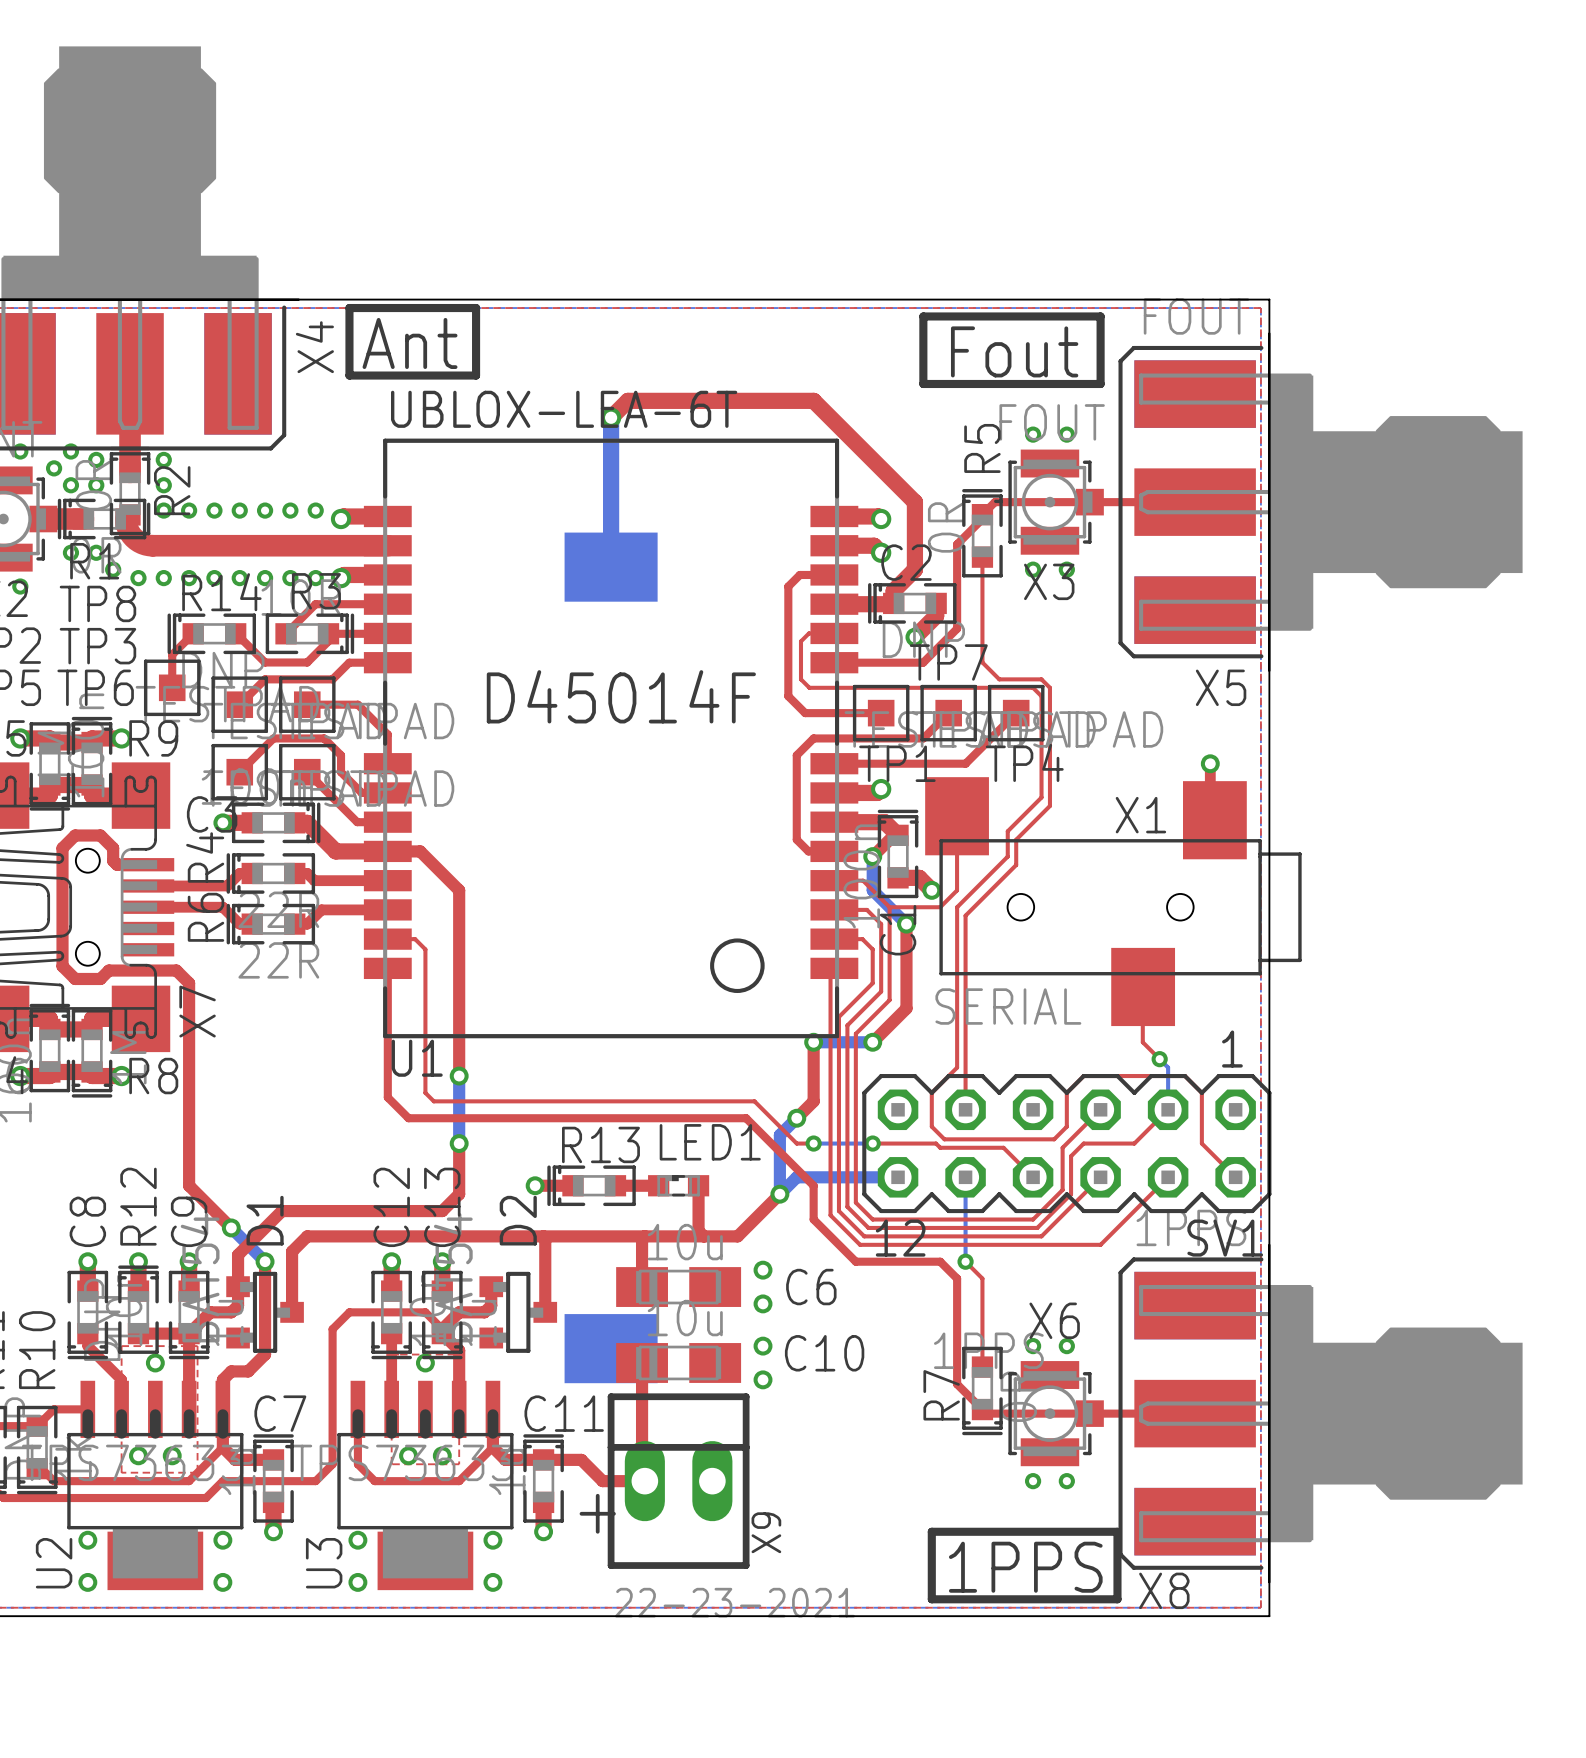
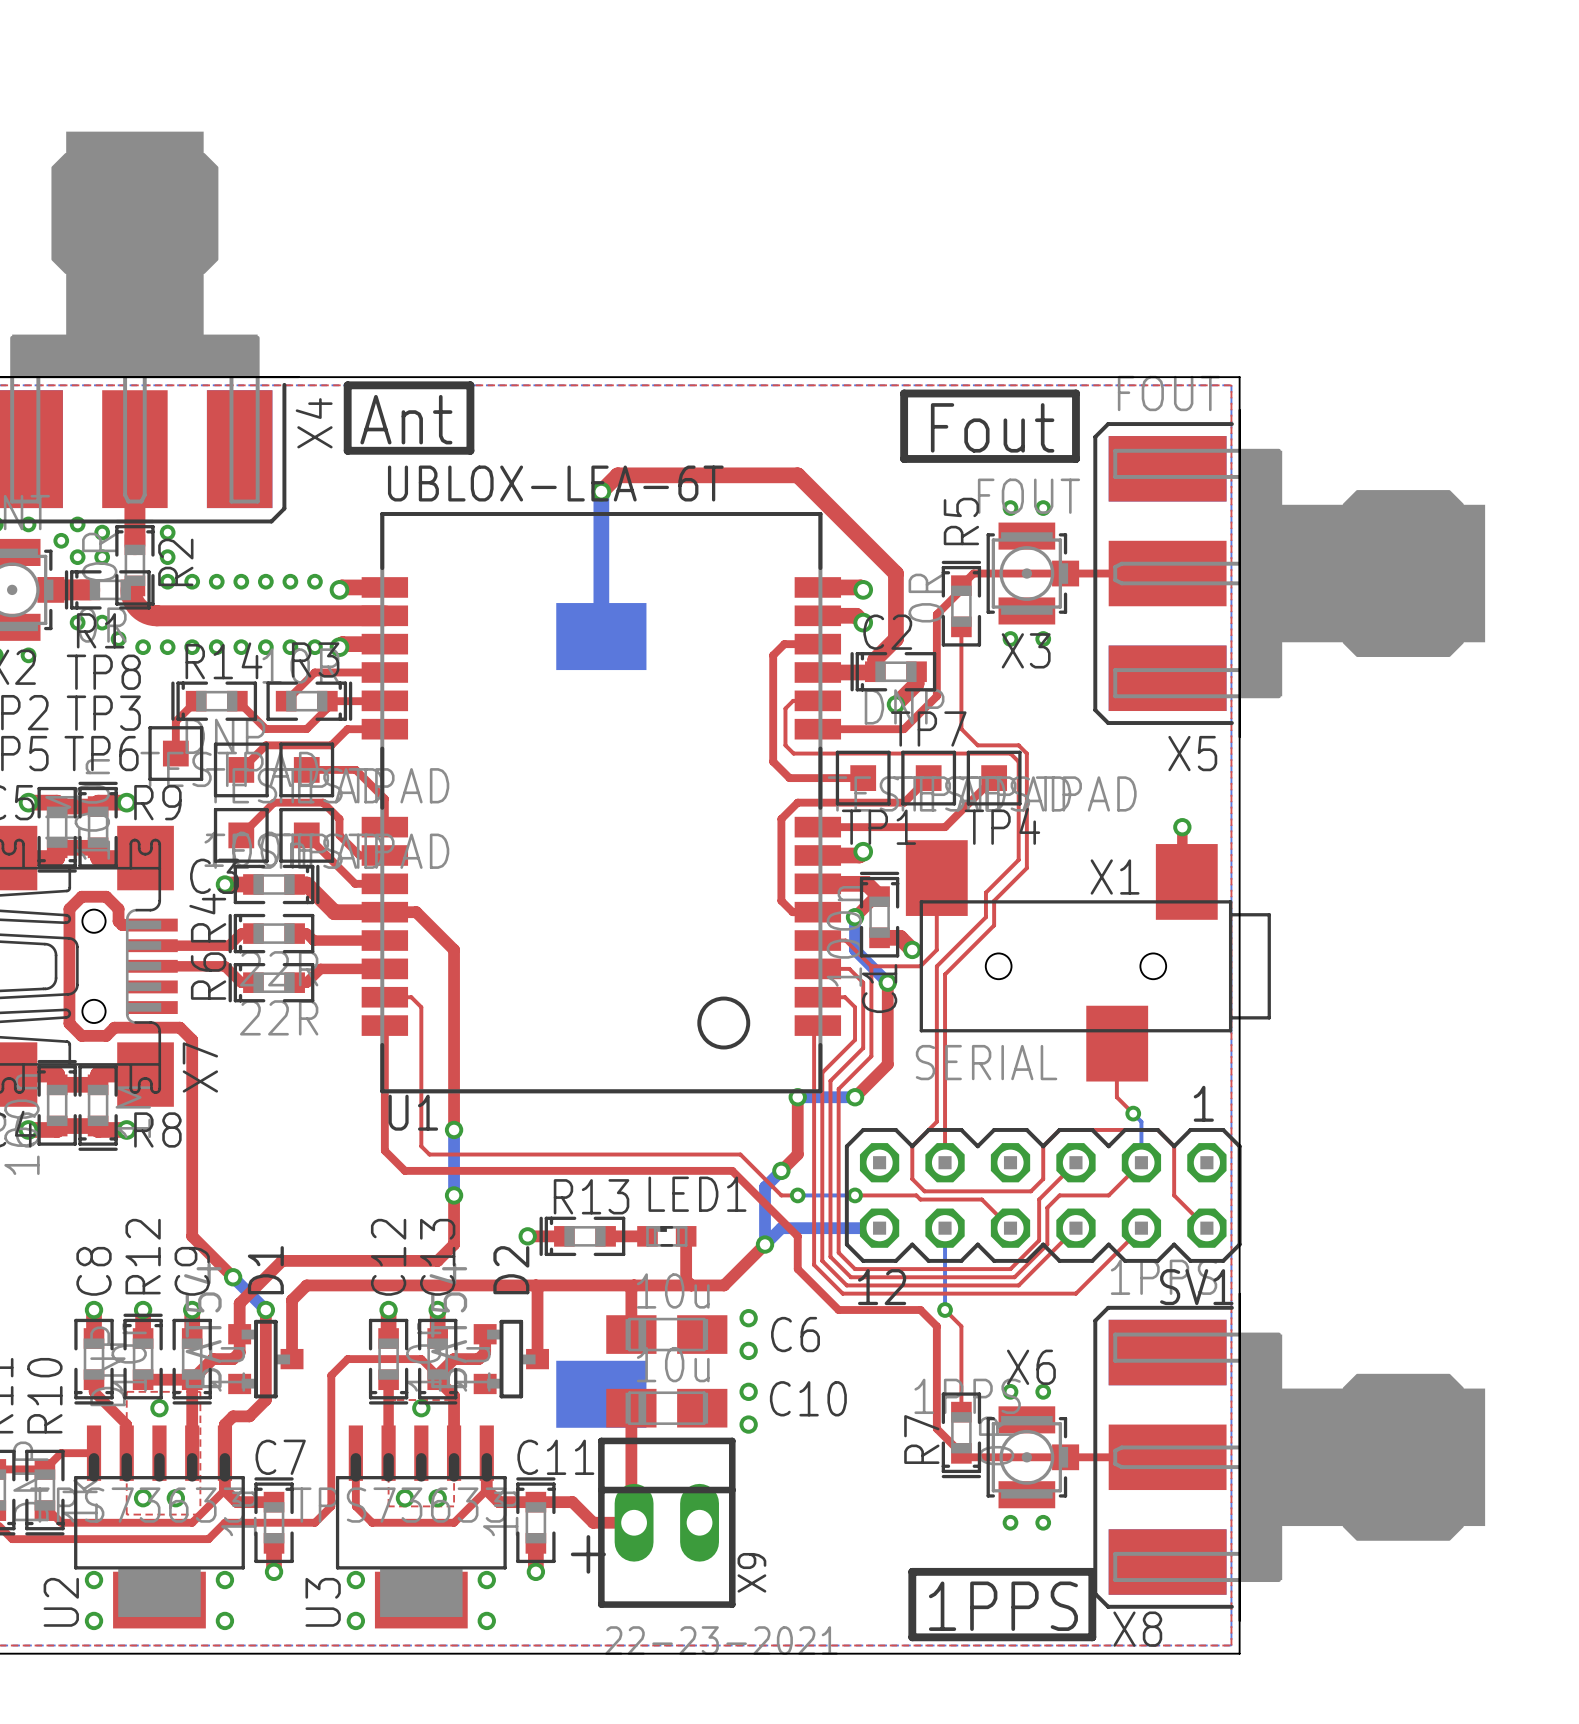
text: D45014F (621, 696) -> none

